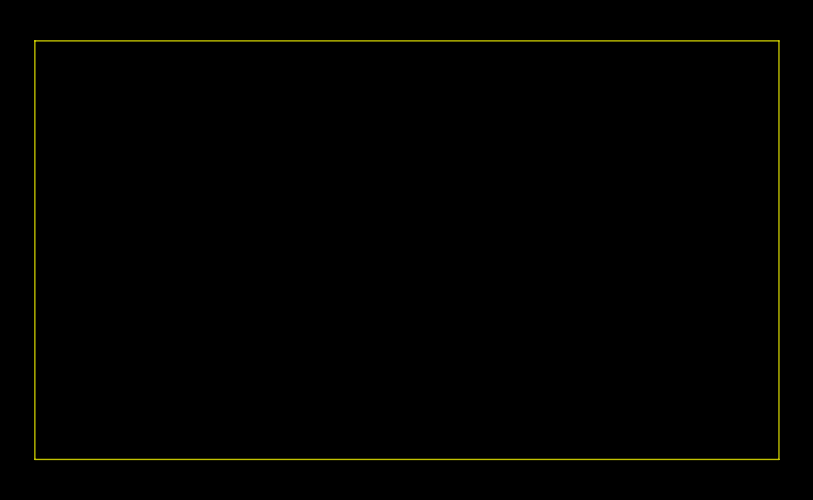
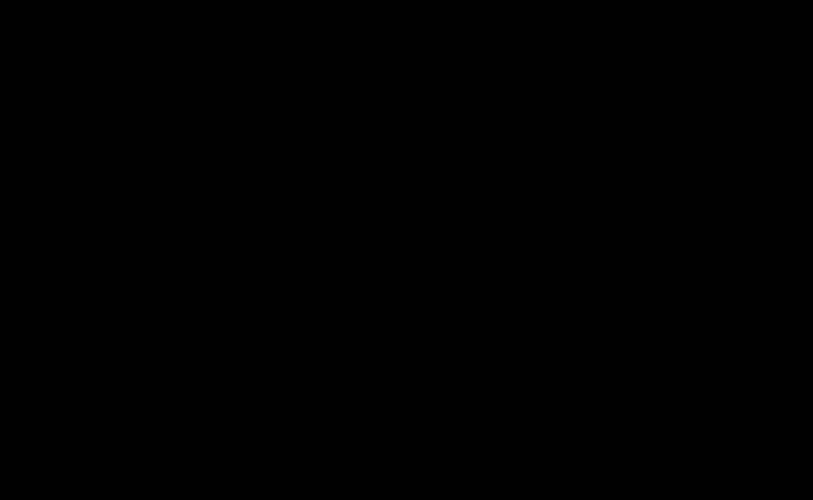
board edge: (778, 40) (34, 40) (34, 459) (778, 459) (778, 40) -> none

